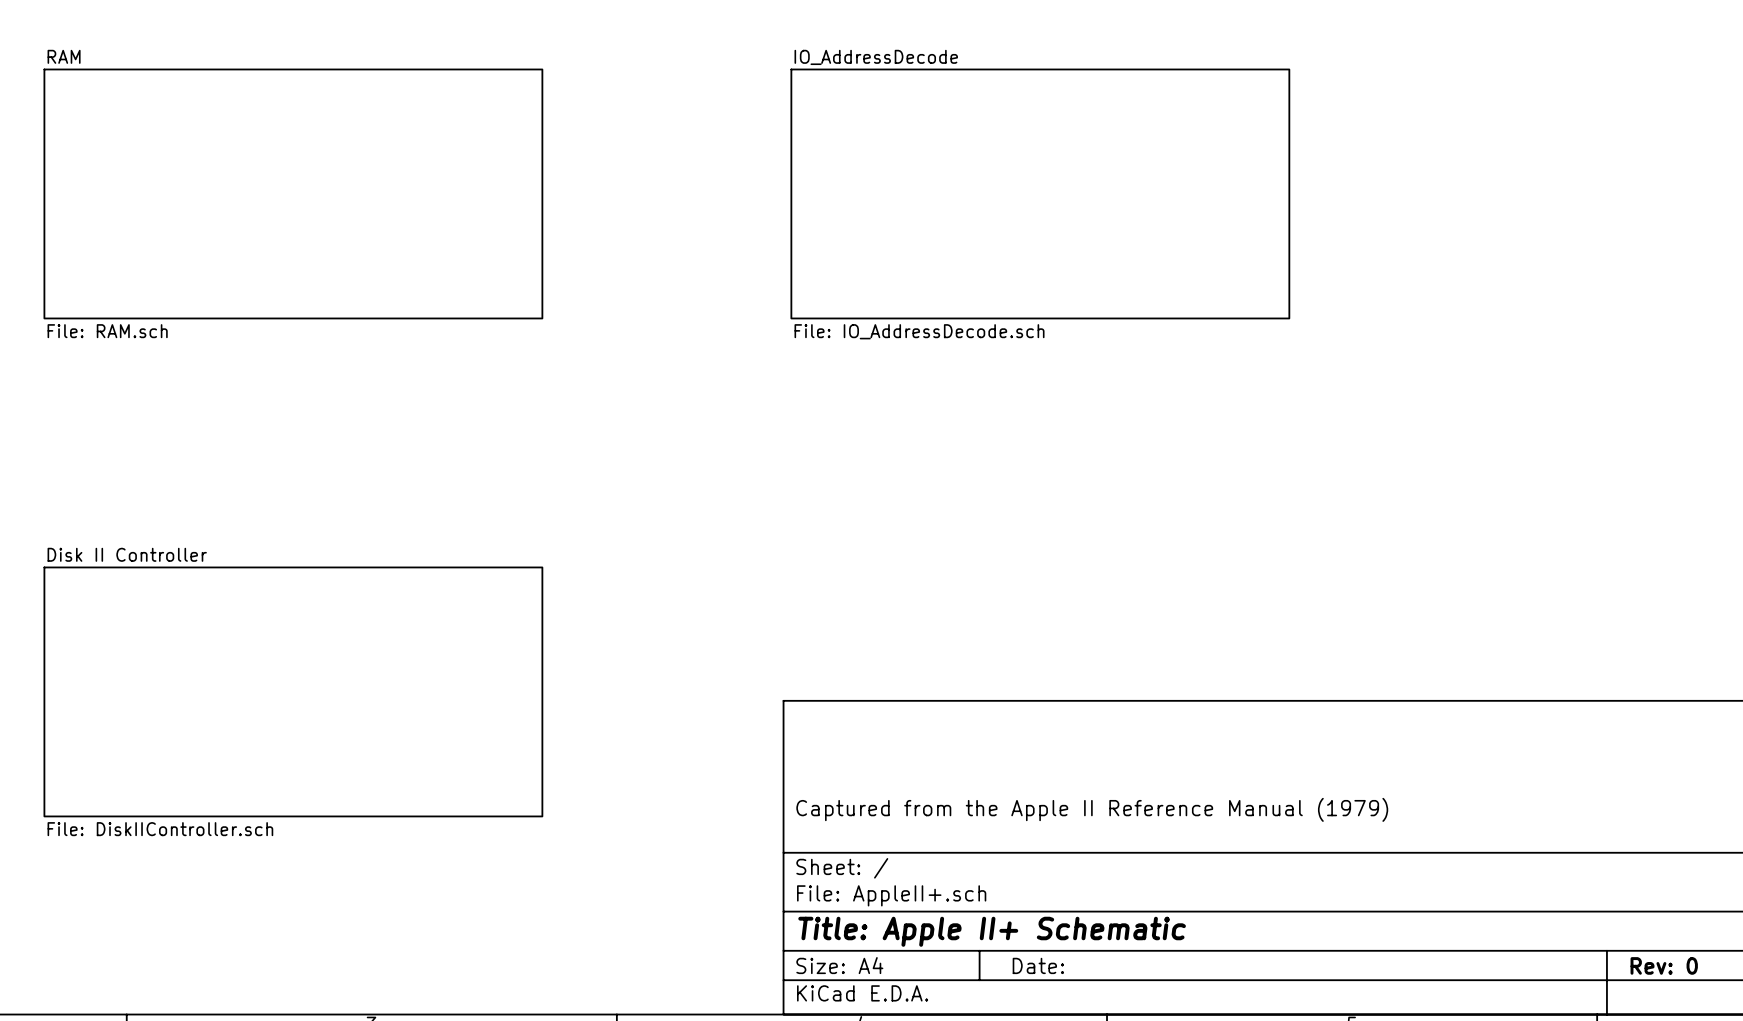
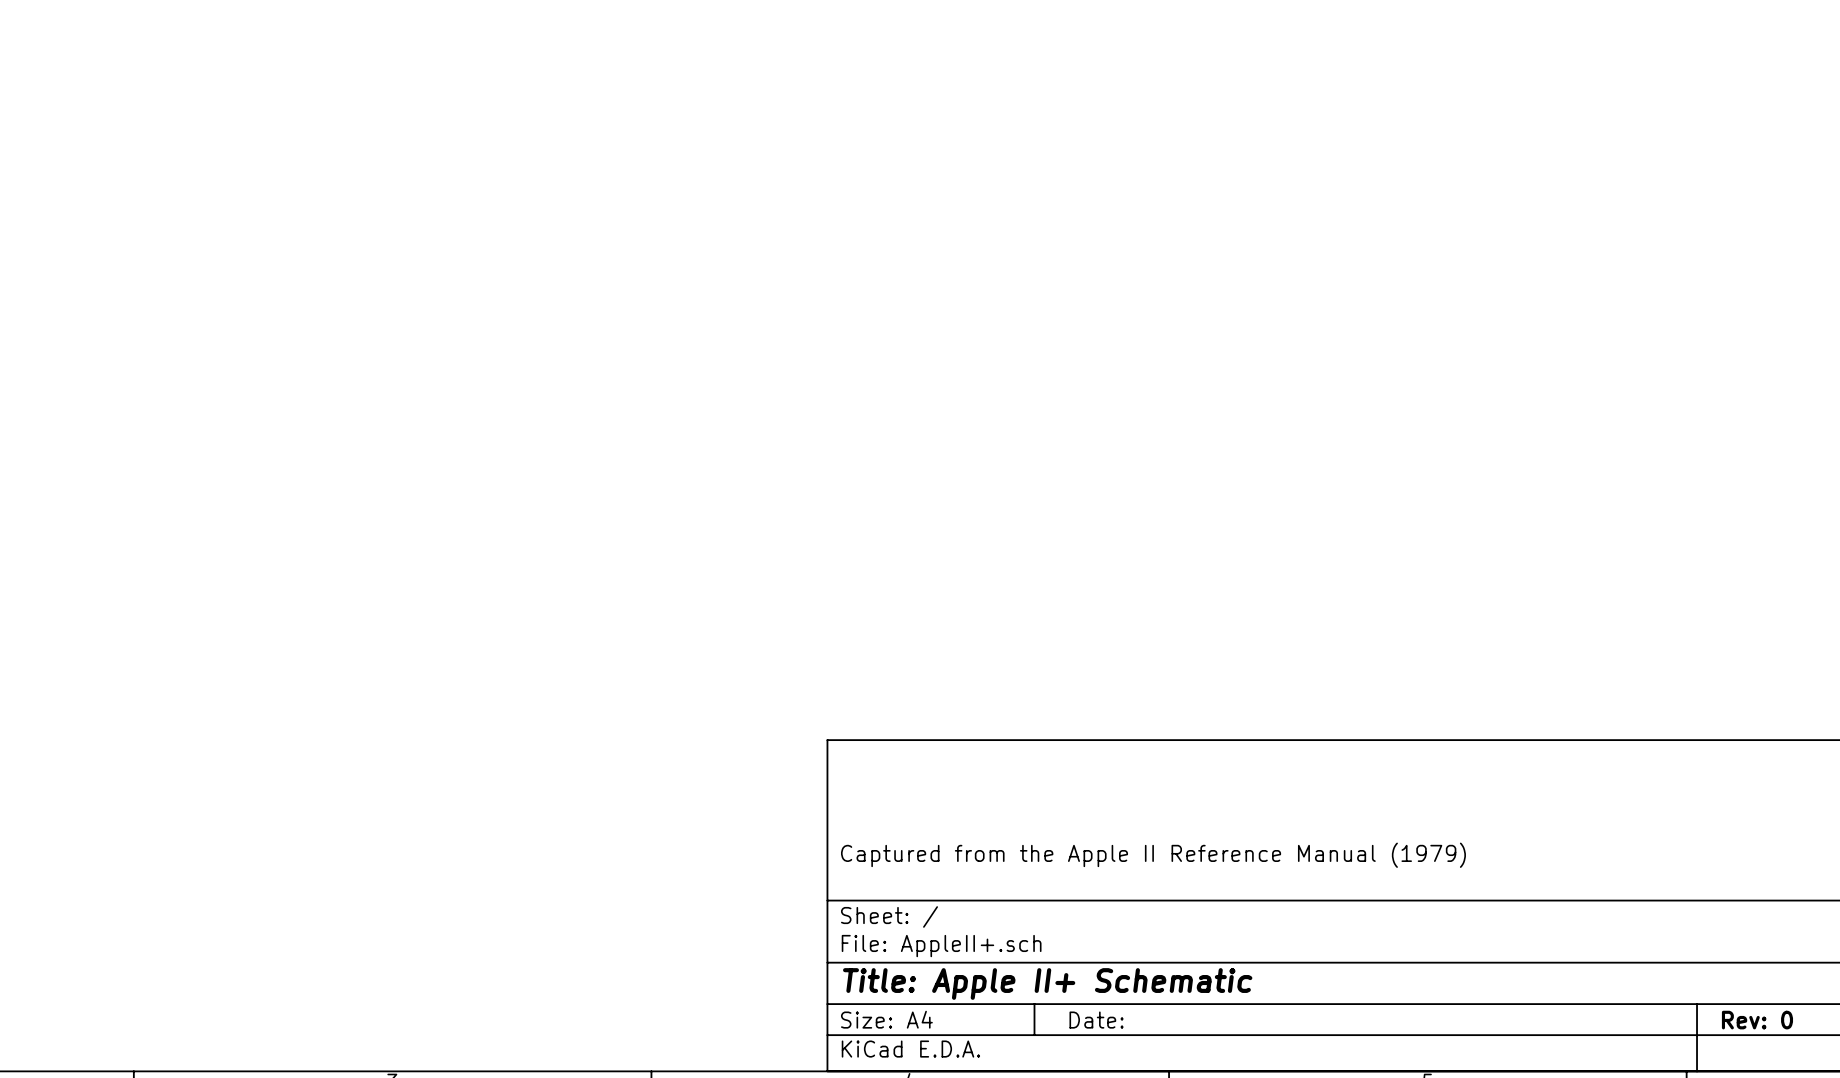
sheet RAM: File: RAM.sch (293, 193) -> none
sheet IO_AddressDecode: File: IO_AddressDecode.sch (1040, 193) -> none
sheet Disk II Controller: File: DiskIIController.sch (293, 691) -> none

